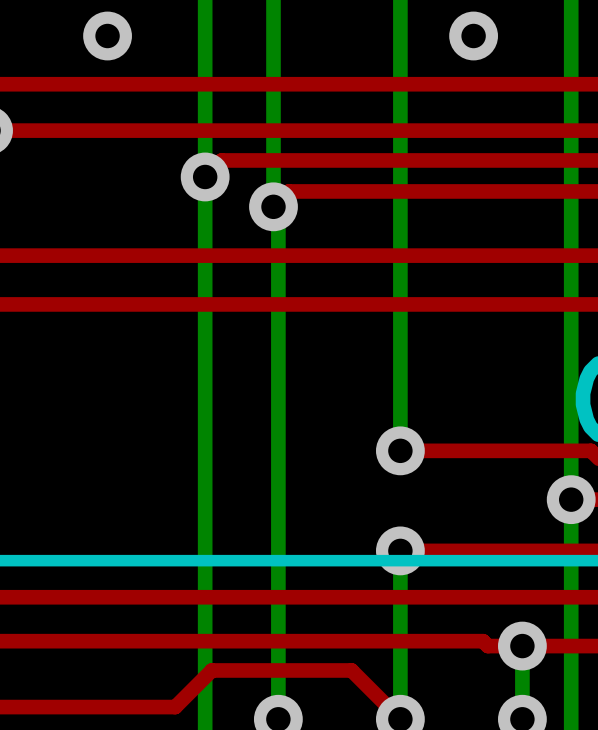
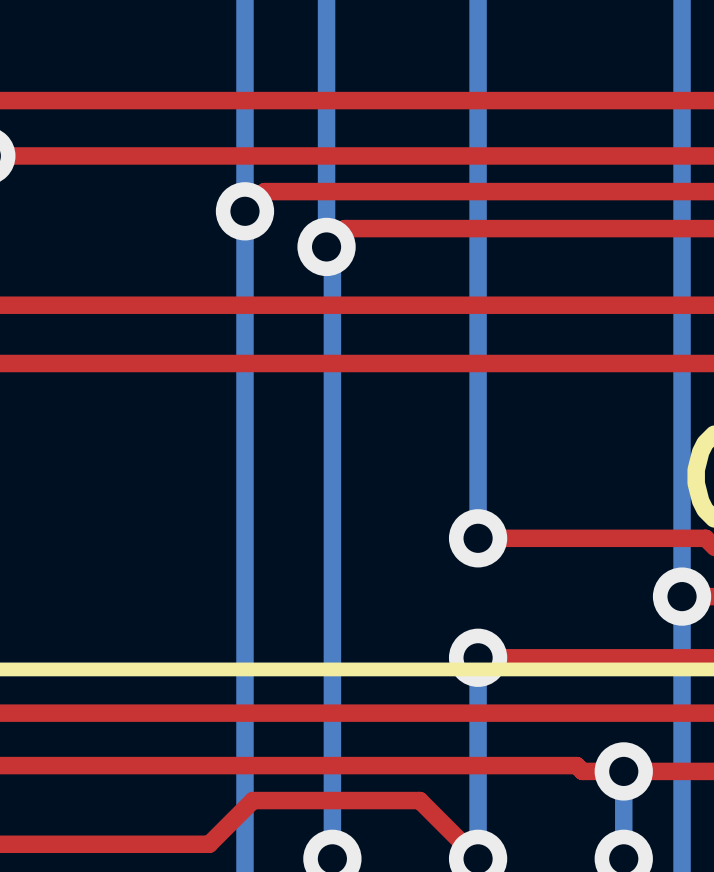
via: (107, 36) -> none
via: (473, 36) -> none

